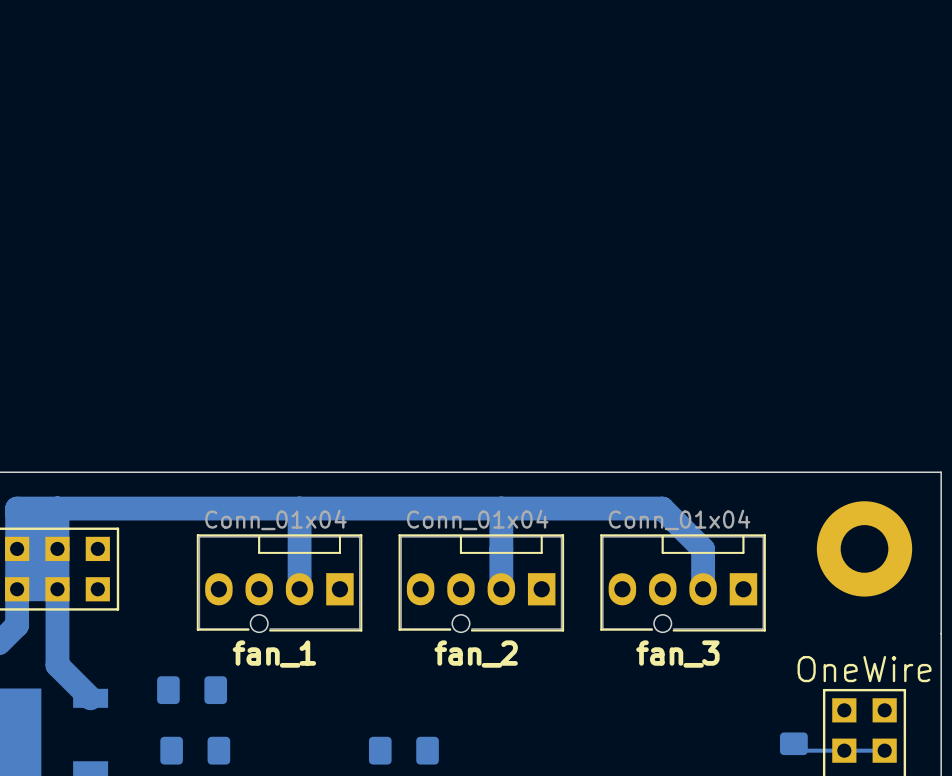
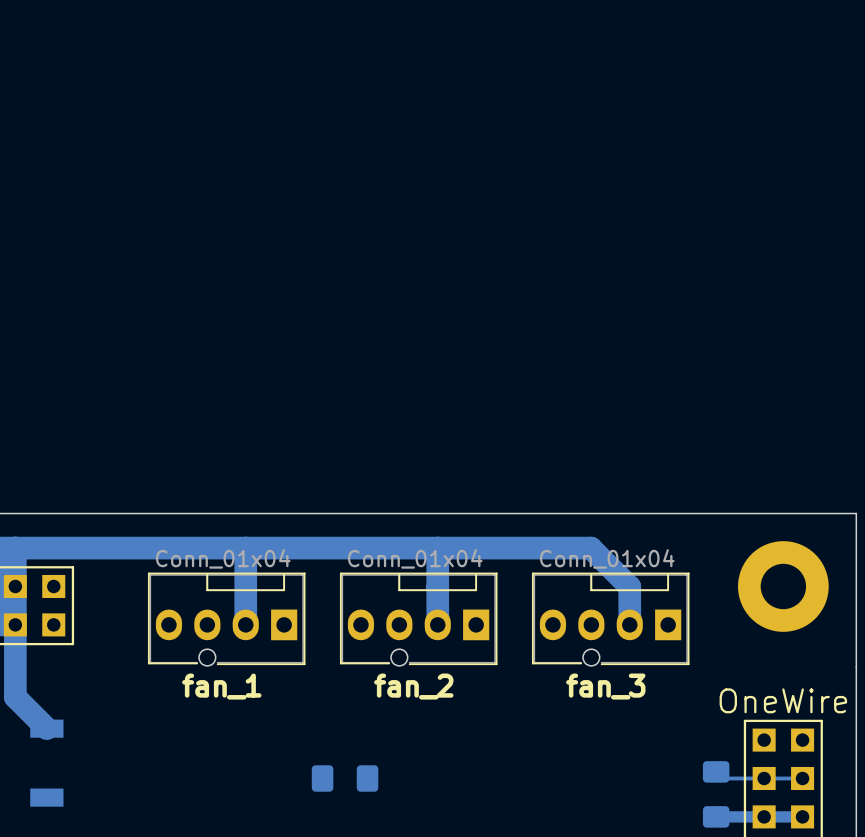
part: (192, 690) -> none
part: (195, 750) -> none

